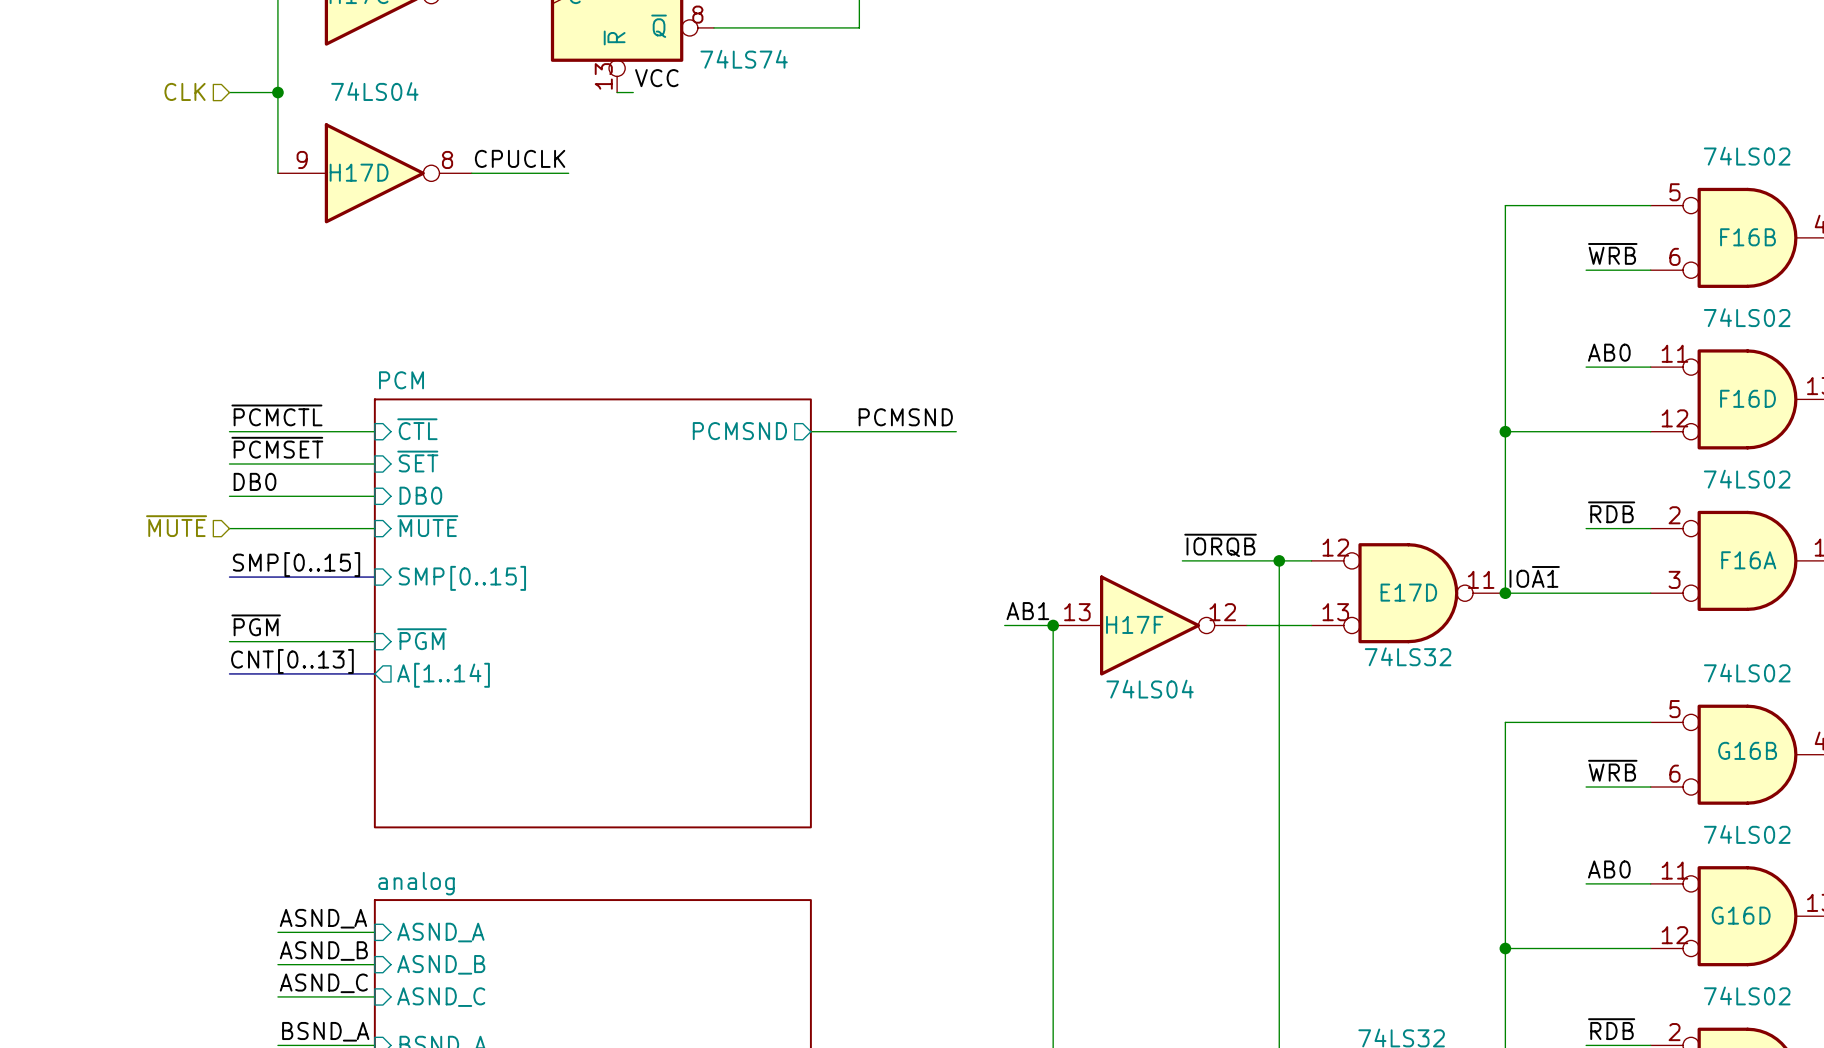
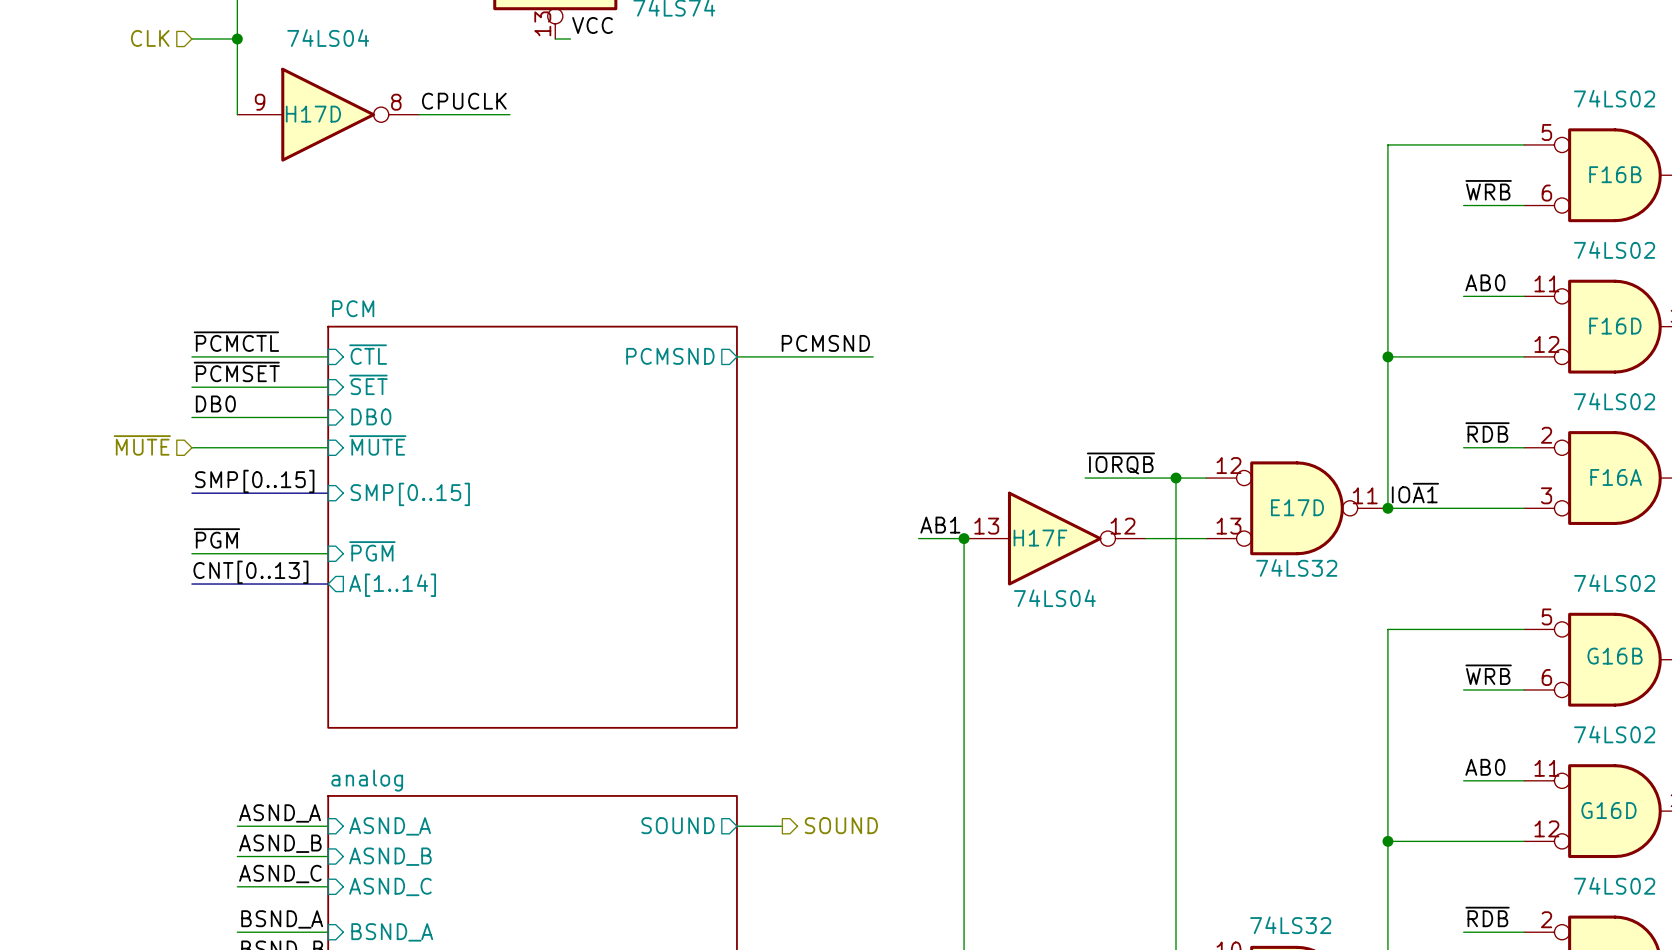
sheet pin: none -> SOUND (677, 825)
hierarchical label: none -> SOUND (841, 825)
wire: none -> (736, 826) (782, 826)

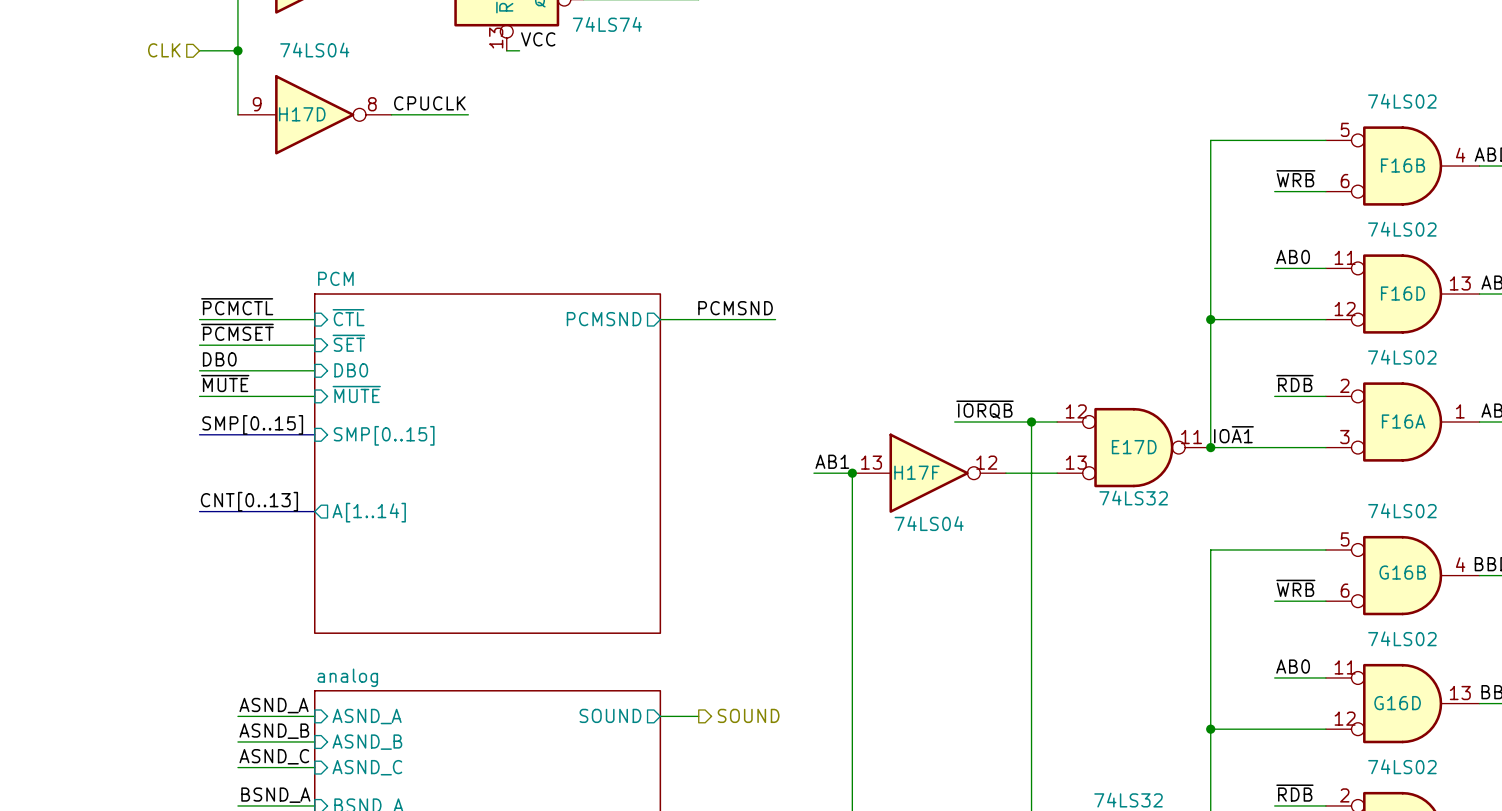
label: none -> ~{MUTE} (225, 383)
hierarchical label: ~{MUTE} (142, 445) -> none
label: ~{PGM} (216, 538) -> none
sheet pin: ~{PGM} (372, 551) -> none
wire: (191, 553) (328, 553) -> none

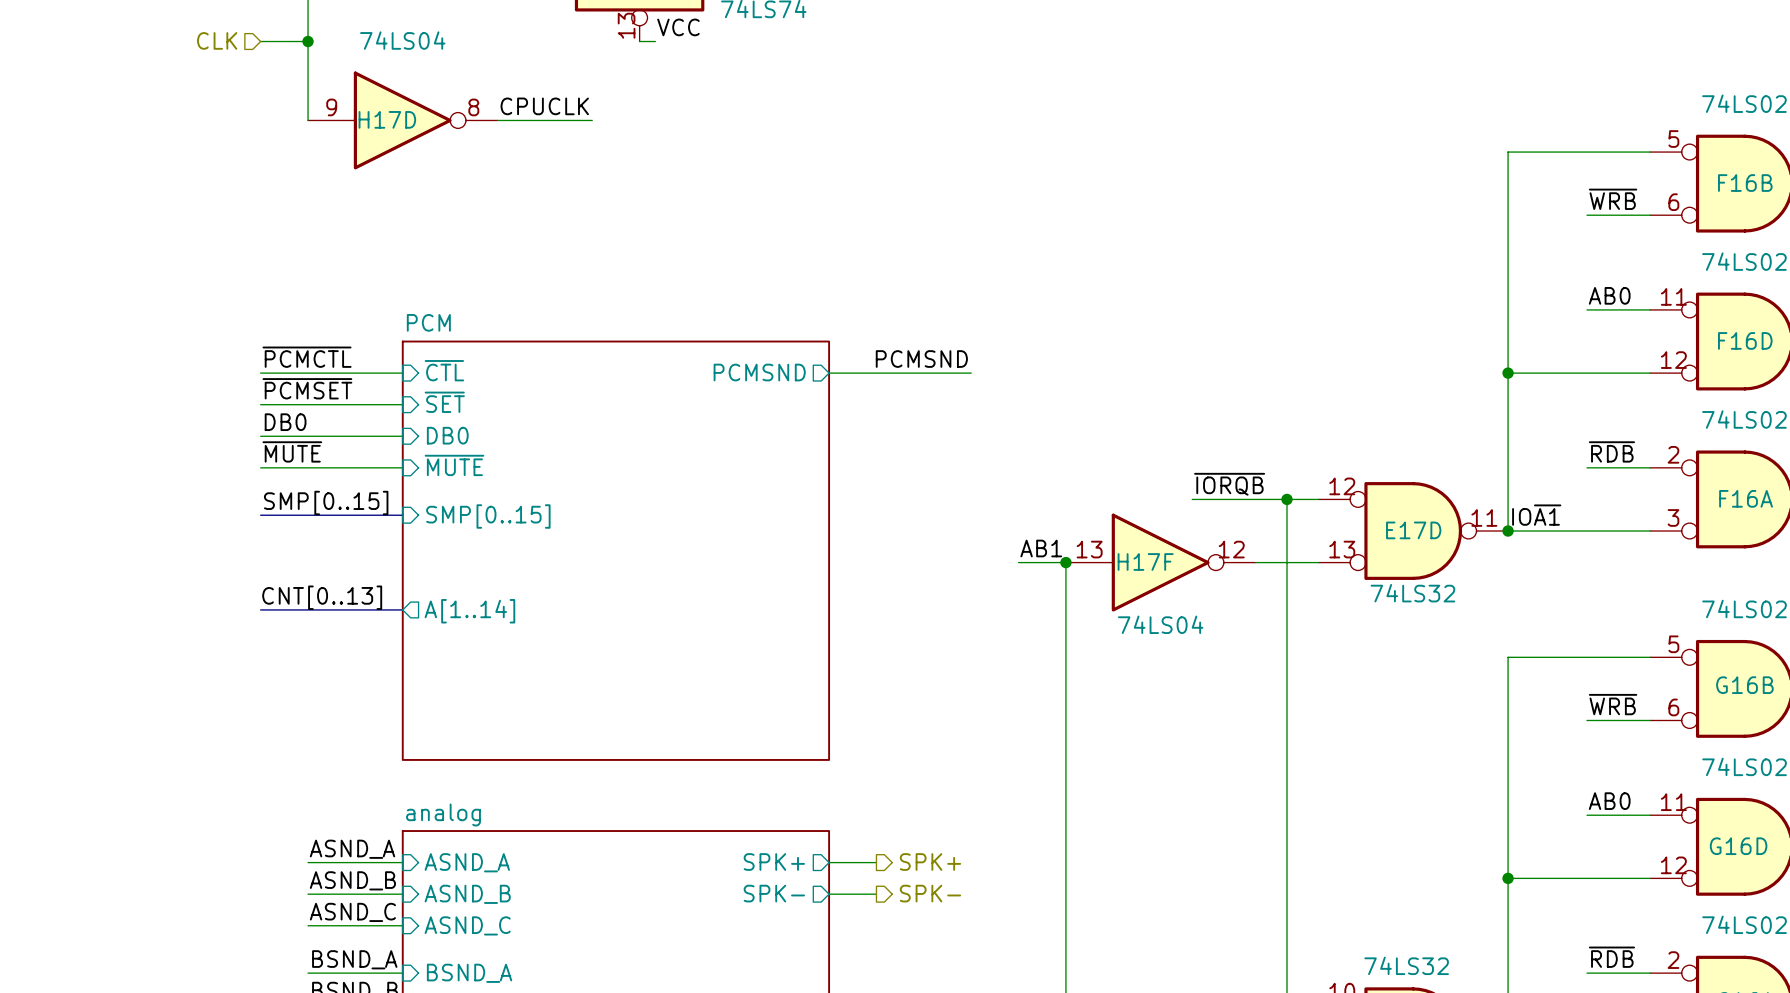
sheet pin: SOUND (610, 715) -> SPK+ (774, 862)
hierarchical label: SOUND (748, 715) -> SPK+ (930, 862)
sheet pin: none -> SPK- (774, 893)
wire: none -> (829, 894) (876, 894)
hierarchical label: none -> SPK- (930, 893)

